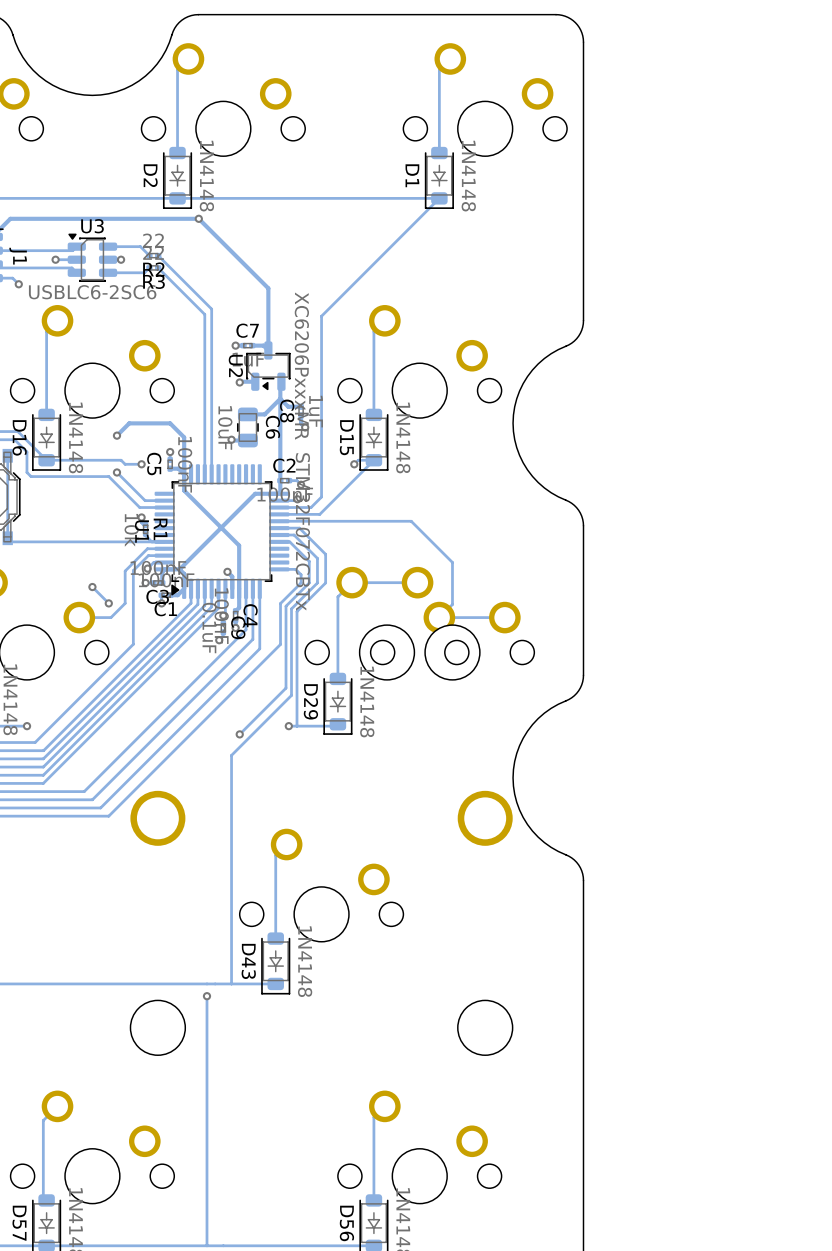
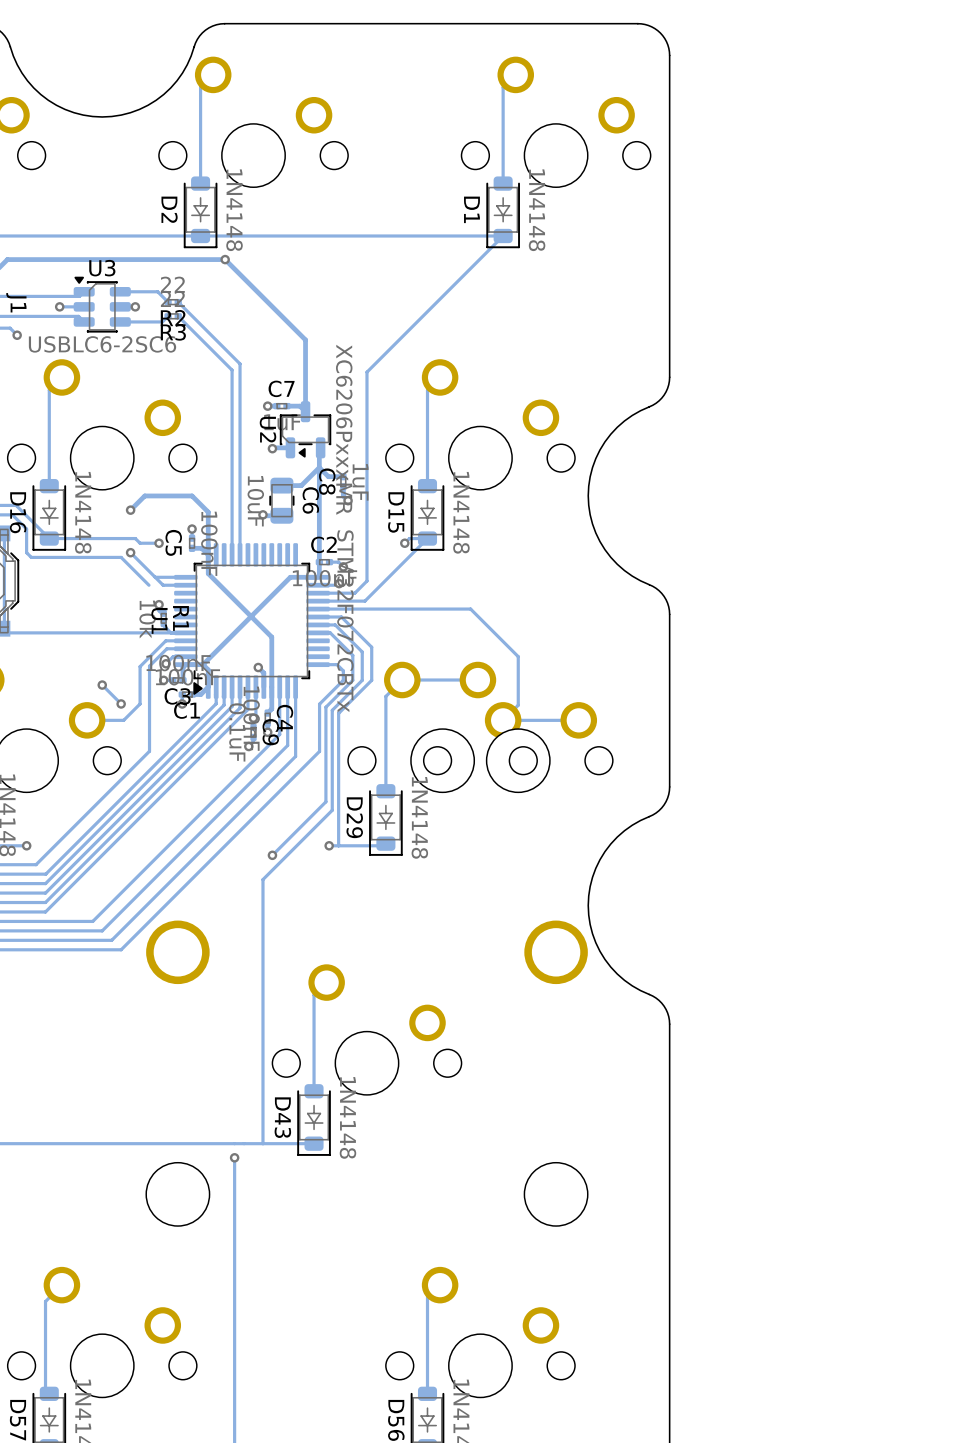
track: none -> (185, 577) (155, 577)
track: (132, 500) (139, 507) (164, 507) -> none

